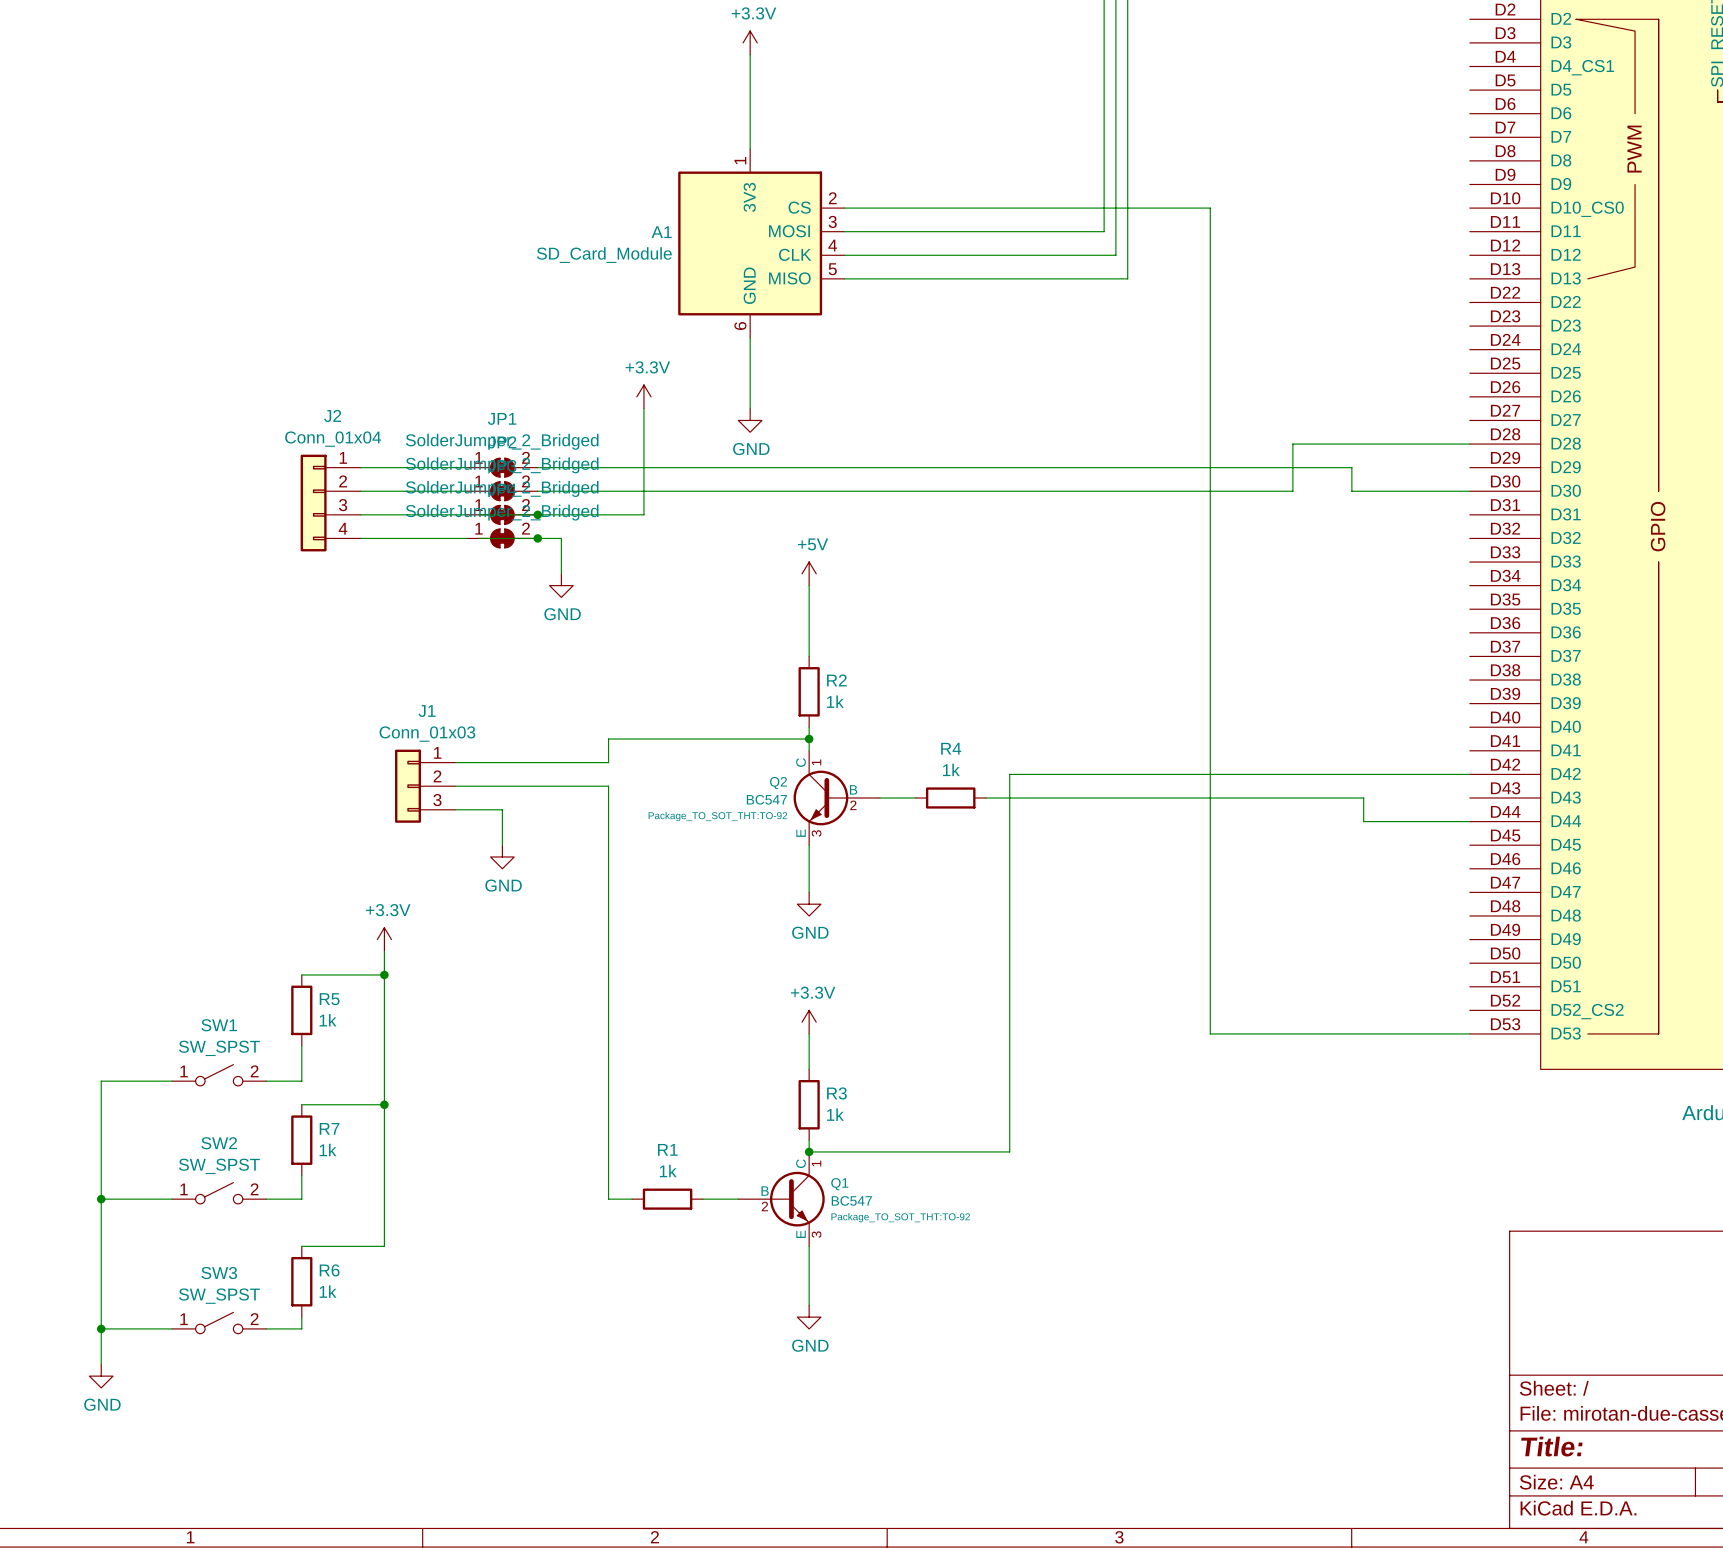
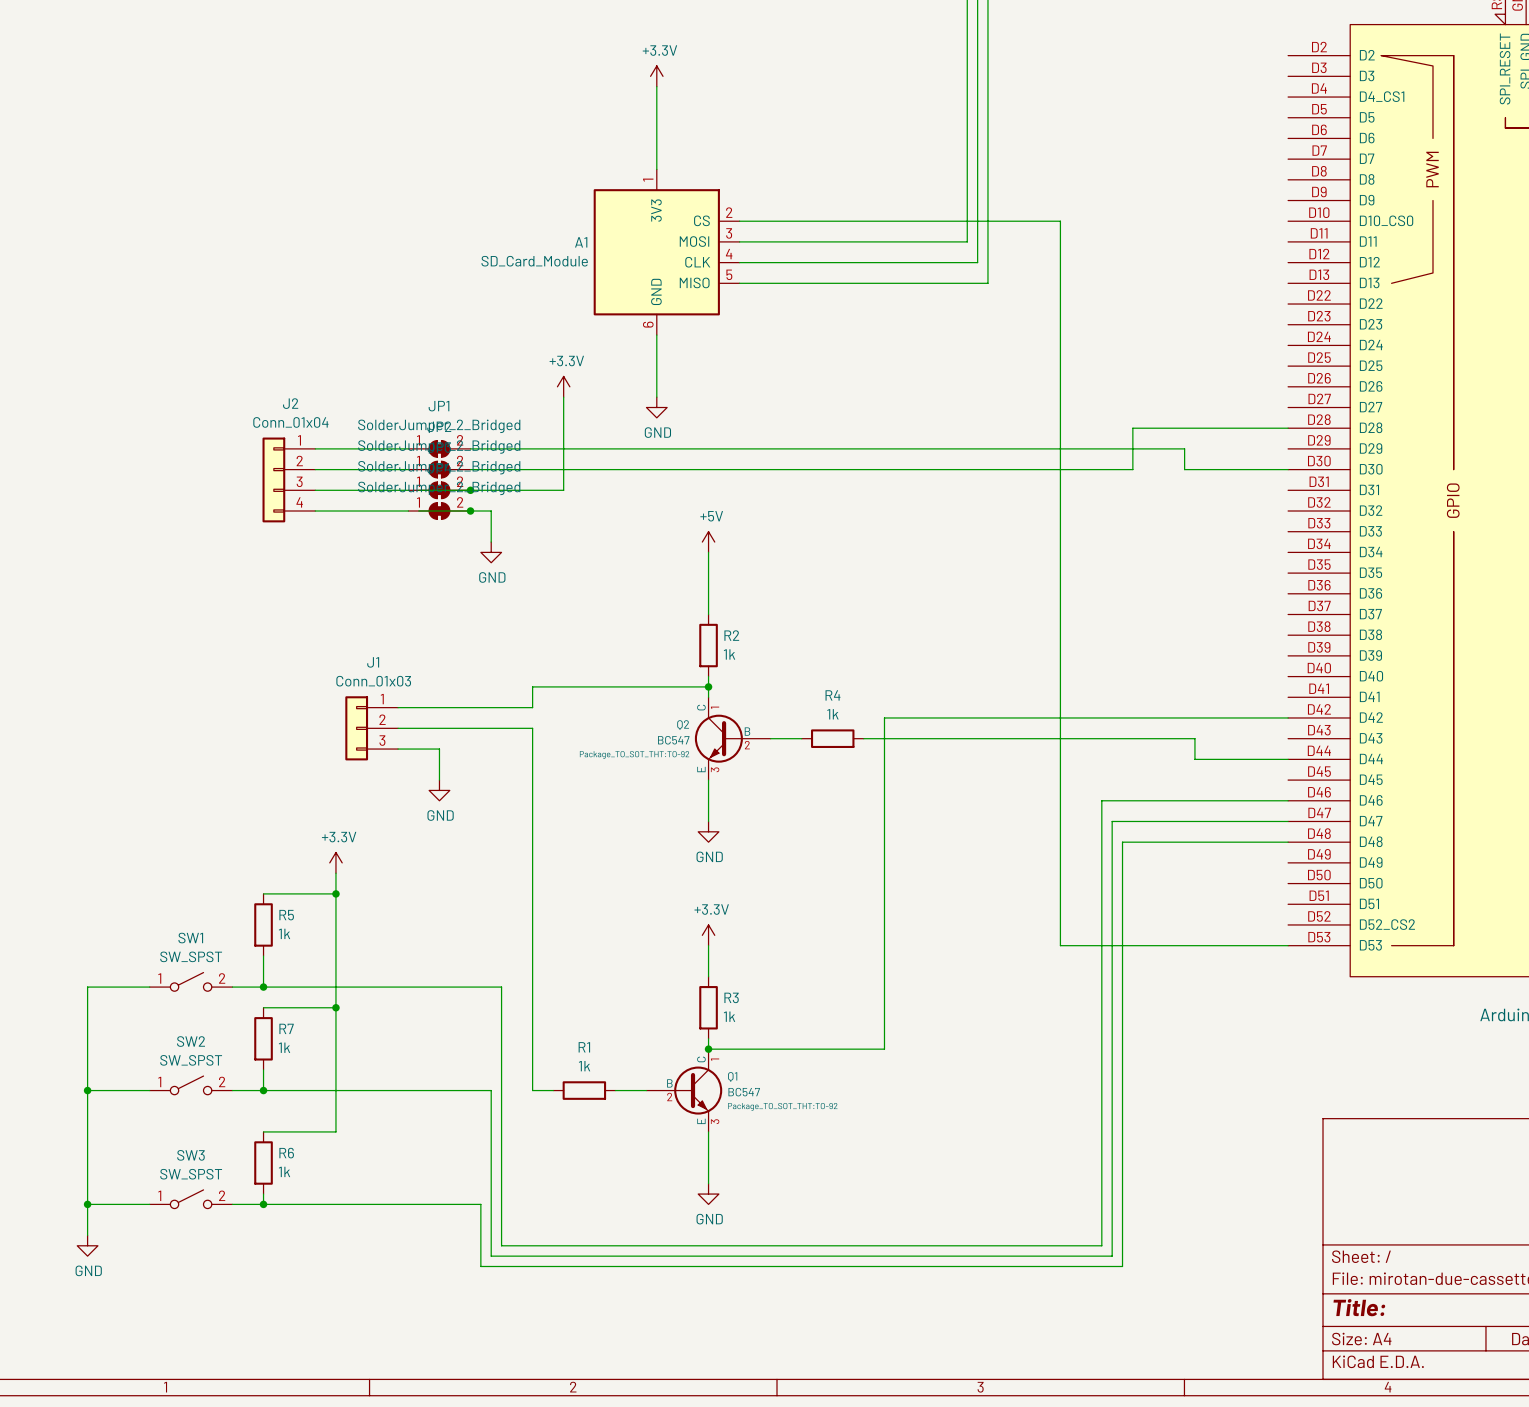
wire: none -> (1288, 800) (1101, 800) (1101, 1245) (501, 1245) (501, 987) (263, 987)
wire: none -> (1288, 821) (1112, 821) (1112, 1256) (491, 1256) (491, 1090) (263, 1090)
wire: none -> (1288, 842) (1122, 842) (1122, 1266) (480, 1266) (480, 1204) (263, 1204)
junction: none -> (263, 987)
junction: none -> (263, 1090)
junction: none -> (263, 1204)

